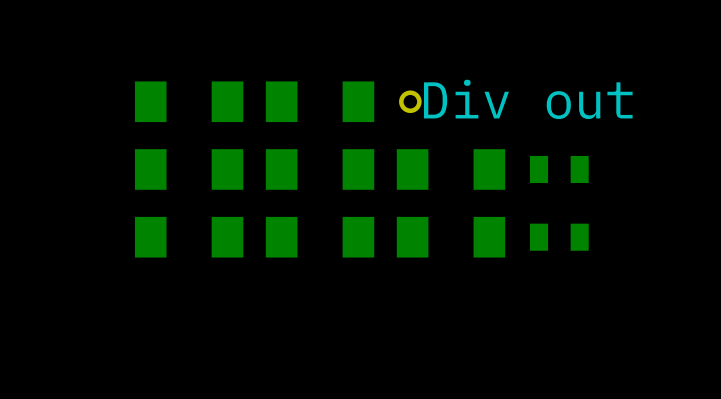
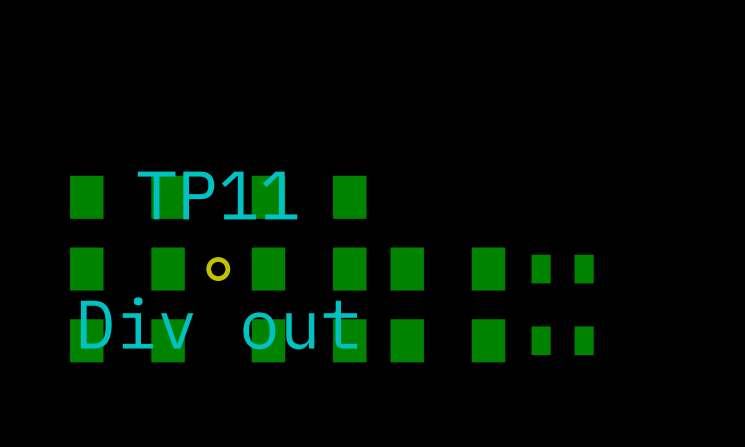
part: none -> (127, 197)
part: (189, 101) -> none
part: Div out (410, 101) -> none
part: none -> (127, 269)
part: (189, 169) -> none
TP11: none -> Div out (218, 269)
part: none -> (127, 340)
part: (189, 237) -> none

